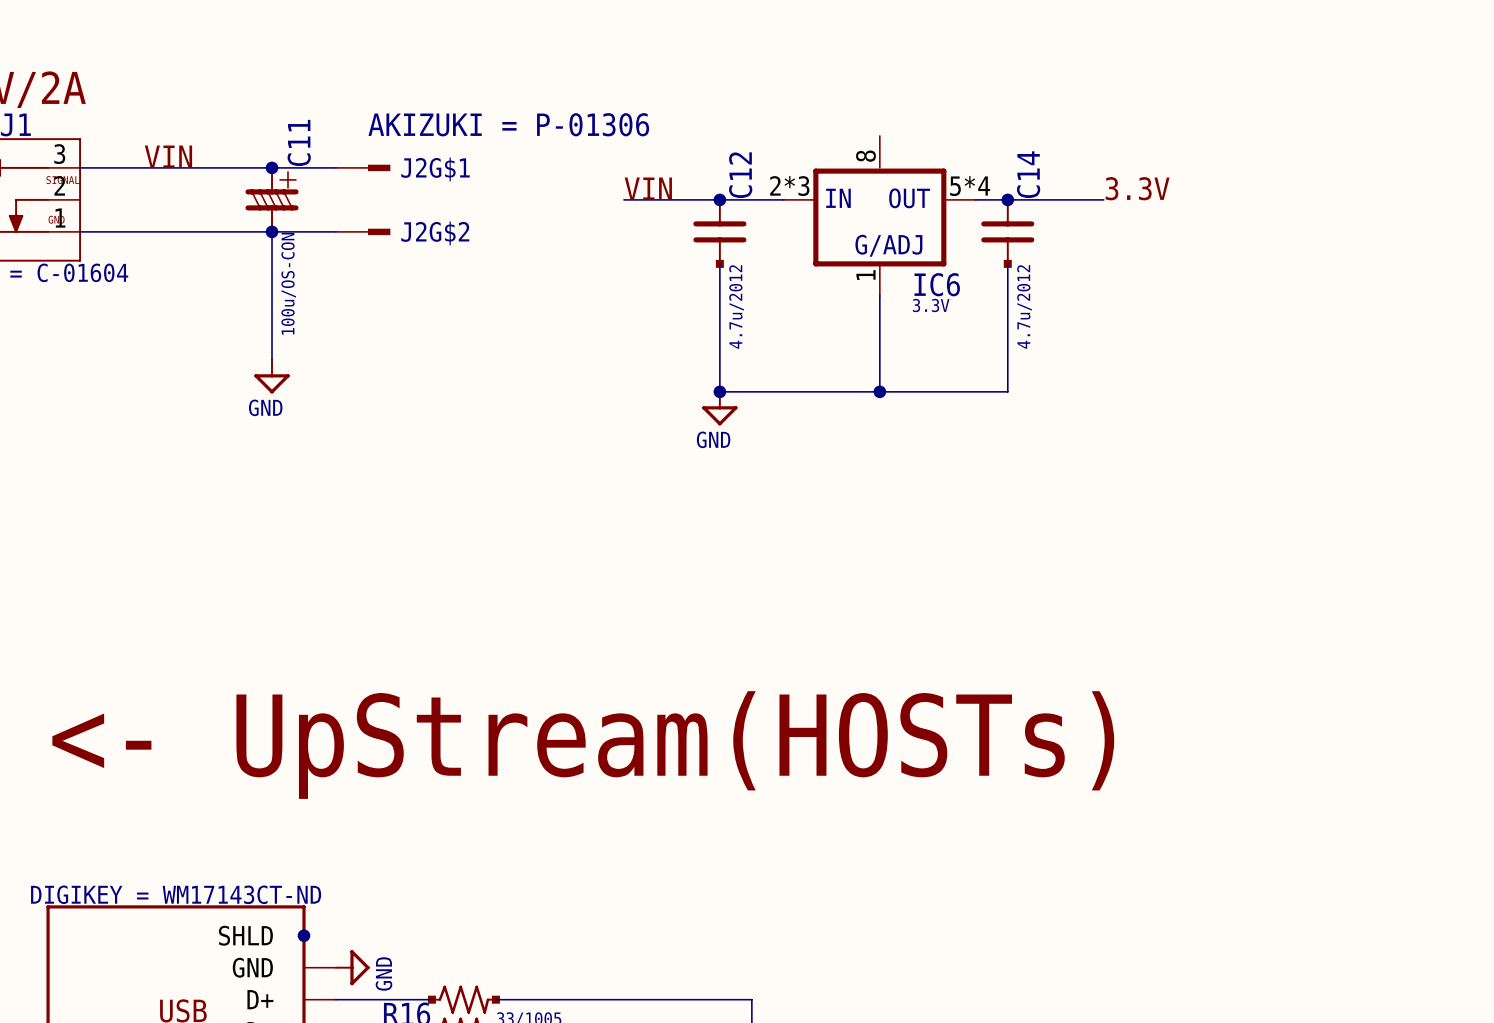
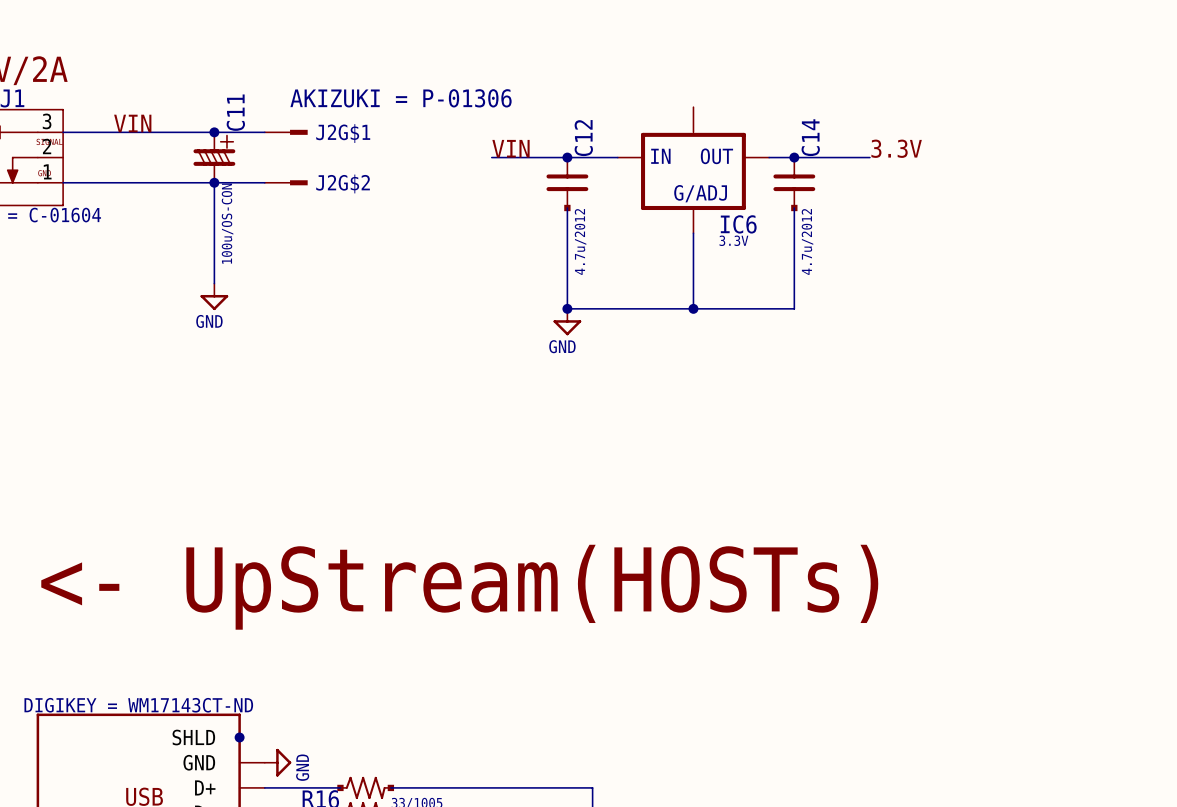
IC6 pin number: 8 (865, 156) -> none
IC6 pin number: 2*3 (789, 186) -> none
IC6 pin number: 5*4 (970, 186) -> none
IC6 pin number: 1 (865, 275) -> none

